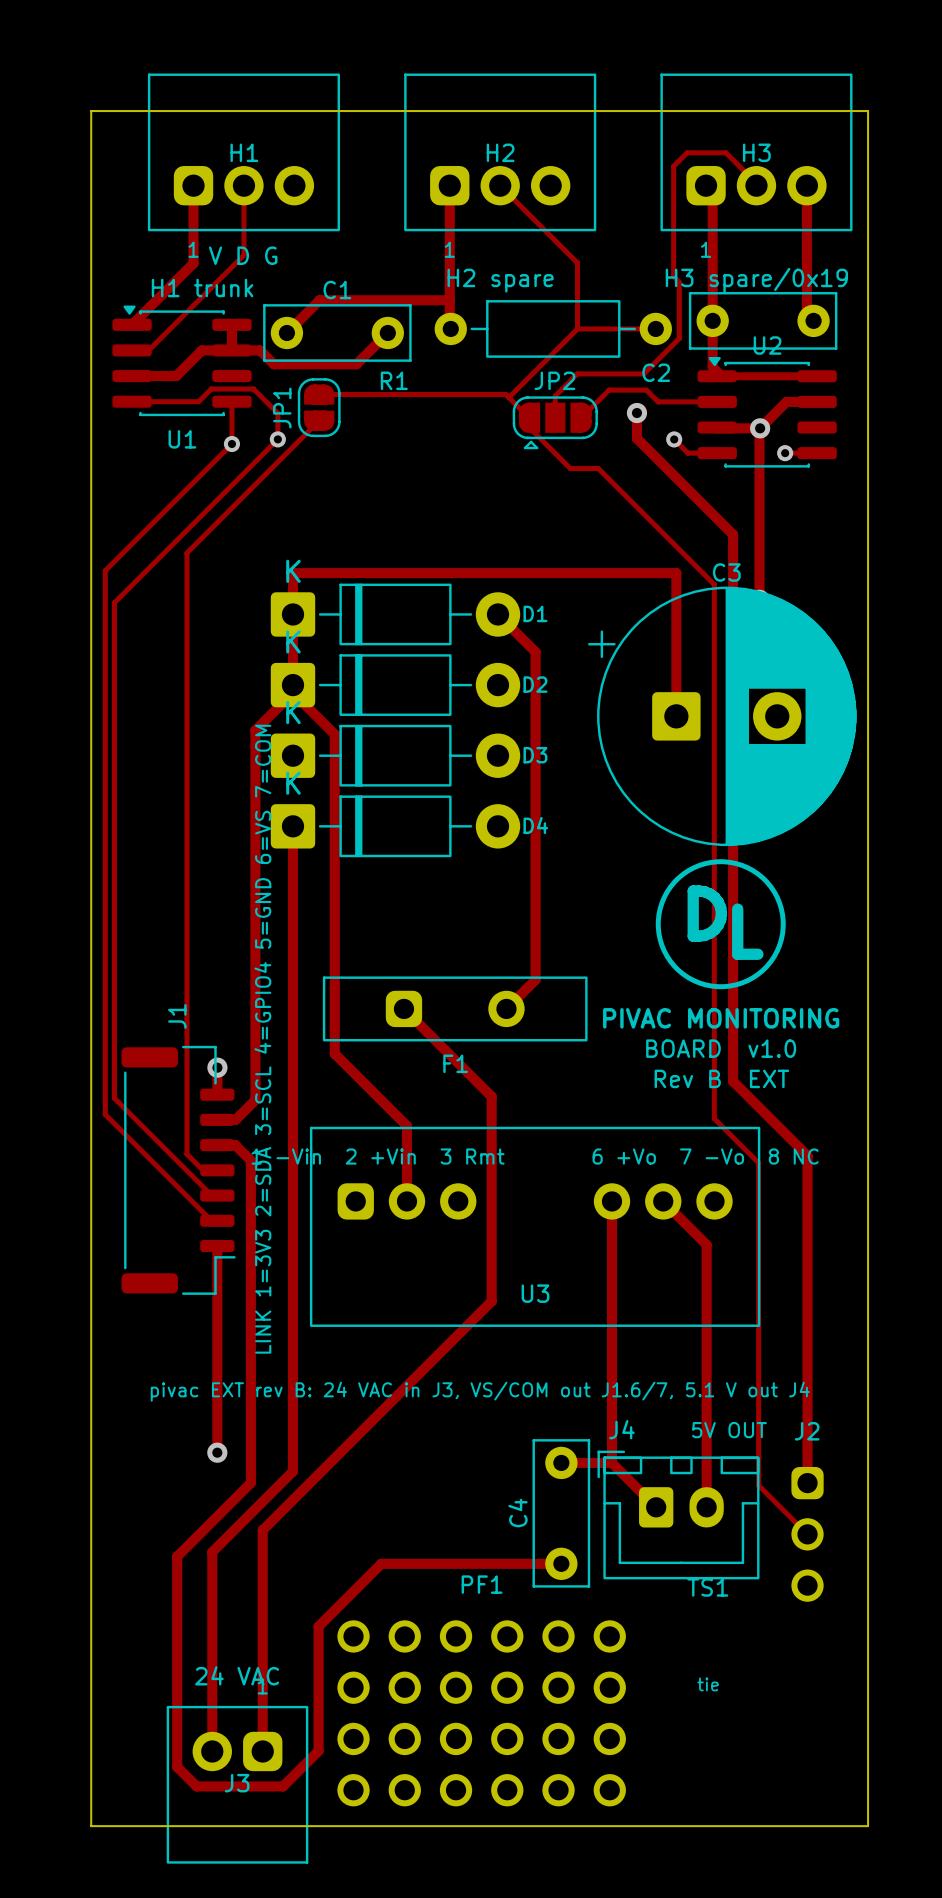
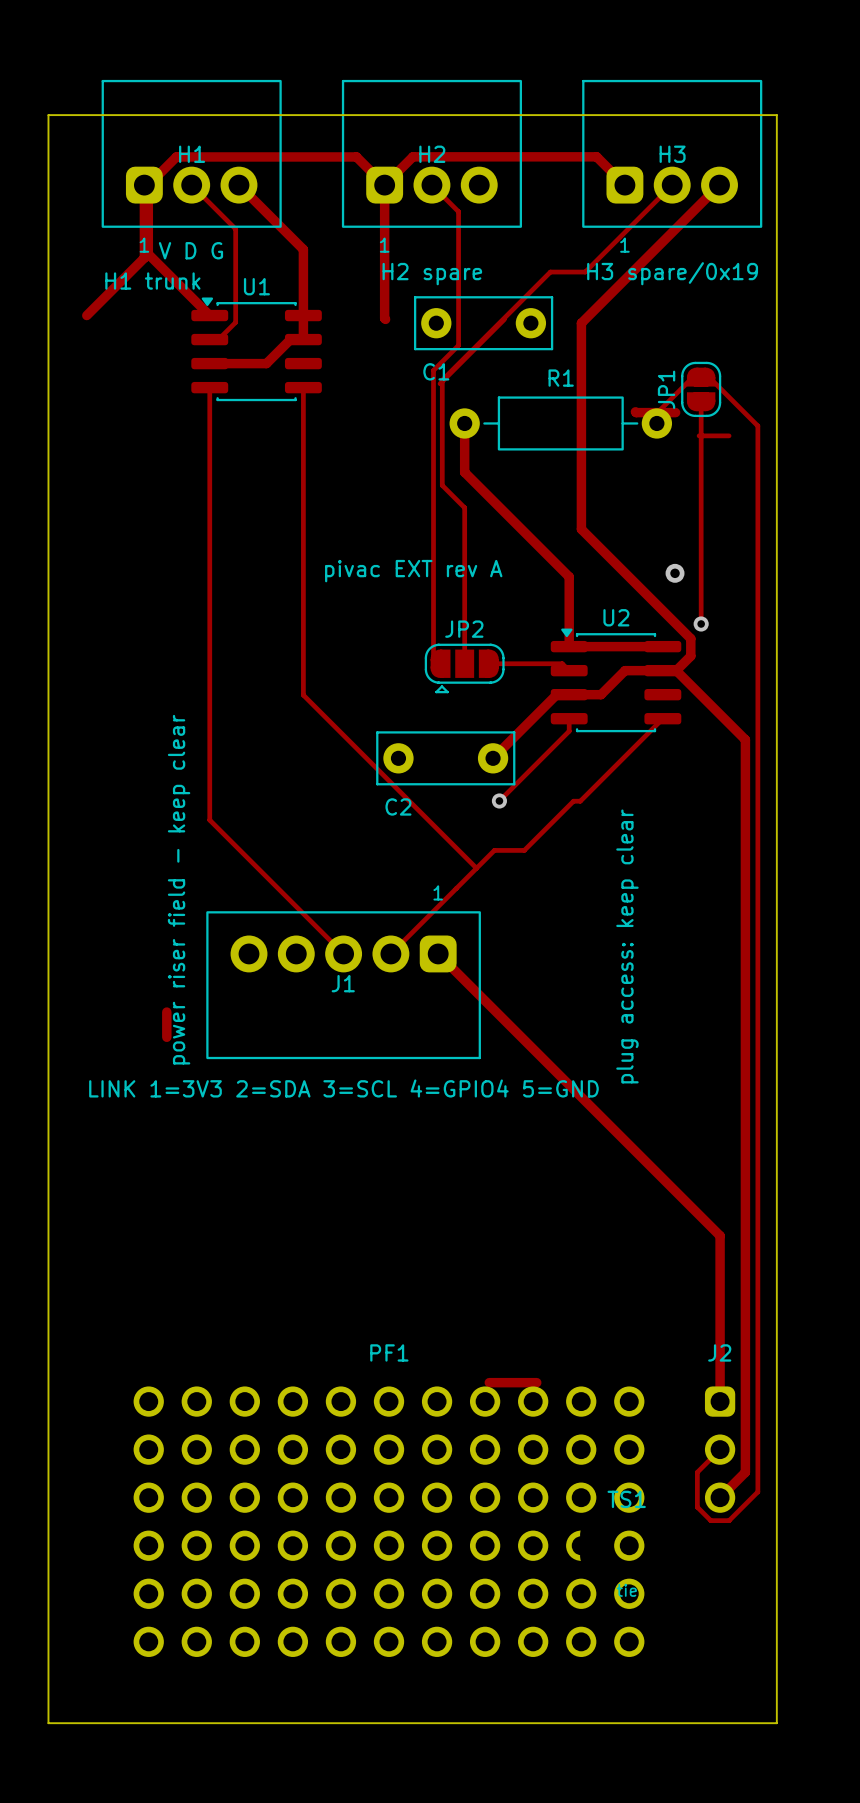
track: (243, 185) (243, 255) (148, 350) (132, 350) -> (191, 185) (235, 229) (235, 322) (218, 339) (209, 339)
track: none -> (238, 185) (303, 249) (303, 339) (290, 339) (266, 363) (209, 363)
track: (706, 185) (712, 192) (712, 367) (721, 376) -> (624, 185) (596, 156) (412, 156) (384, 185) (356, 156) (176, 156) (148, 185) (148, 254) (209, 315)
track: (756, 185) (756, 183) (725, 152) (687, 152) (673, 166) (673, 276) (679, 282) (679, 338) (643, 373) (577, 373) (555, 396) (555, 417) -> (672, 185) (585, 272) (550, 272) (442, 380) (442, 485) (464, 507) (464, 663)
track: (806, 185) (806, 314) (813, 320) -> (719, 185) (581, 323) (581, 529) (690, 638) (690, 656) (676, 670)
track: (528, 214) (577, 262) (577, 328) (655, 328) -> (458, 211) (458, 345) (433, 370) (433, 657) (440, 663)
C1 name position: C1 (337, 290) -> C1 (436, 371)
track: (449, 300) (319, 300) (286, 332) -> none
C2 position: (763, 320) -> (445, 758)
track: (231, 324) (231, 350) -> none
R1 position: (553, 328) -> (560, 423)
C1 position: (337, 332) -> (483, 323)
track: (387, 332) (356, 364) (273, 364) (260, 350) (201, 350) (176, 376) (132, 376) -> none
U1 position: (182, 360) -> (256, 349)
C2 name position: C2 (656, 372) -> C2 (398, 806)
track: (717, 376) (817, 376) -> none
R1 name position: R1 (394, 380) -> R1 (561, 378)
track: (319, 394) (505, 394) (529, 417) (529, 427) (570, 468) (598, 468) (714, 584) (714, 1118) (758, 1162) (758, 1485) (807, 1534) -> (656, 423) (656, 413) (692, 377) (709, 377) (757, 425) (757, 1491) (729, 1520) (710, 1520) (697, 1507) (697, 1472) (720, 1449)
track: (132, 401) (198, 401) (211, 389) (253, 389) (277, 413) (277, 439) (114, 602) (114, 1098) (211, 1195) (217, 1195) -> none
track: (231, 401) (231, 444) (105, 570) (105, 1114) (211, 1220) (217, 1220) -> none
track: none -> (209, 387) (209, 820) (343, 953)
track: none -> (303, 387) (303, 695) (476, 868)
track: (717, 401) (658, 401) (646, 390) (609, 390) (581, 417) -> none
track: (817, 401) (786, 401) (759, 429) (759, 599) -> none
JP1 position: (319, 407) -> (701, 389)
U2 position: (767, 412) -> (616, 680)
track: (636, 413) (636, 438) (733, 534) (733, 1081) (807, 1155) (807, 1306) -> (438, 953) (720, 1235)
via: (636, 413) -> none
track: none -> (701, 401) (701, 623)
track: (319, 420) (186, 553) (186, 1154) (203, 1170) (217, 1170) -> none
JP2 position: (555, 422) -> (464, 668)
via: (760, 428) -> none
U1 name position: U1 (182, 439) -> U1 (256, 286)
via: (277, 439) -> none
track: none -> (464, 423) (464, 472) (569, 576) (569, 646) (662, 646)
track: (674, 439) (687, 453) (717, 453) -> none
via: (674, 439) -> none
via: (231, 444) -> none
via: (785, 453) -> none
text: none -> pivac EXT rev A (413, 571)
D1: (395, 614) -> none
track: (498, 614) (535, 652) (535, 979) (506, 1008) -> none
via: none -> (701, 623)
D2: (395, 685) -> none
track: (292, 692) (292, 573) (676, 573) (676, 716) -> none
track: (292, 692) (334, 734) (334, 1053) (407, 1126) (407, 1201) -> none
track: (293, 692) (255, 730) (255, 1100) (235, 1119) (217, 1119) -> none
track: none -> (489, 663) (562, 663) (569, 670)
track: none -> (676, 670) (745, 739) (745, 1472) (720, 1497)
track: none -> (676, 670) (625, 670) (601, 694) (556, 694) (493, 758)
C3: (722, 716) -> none
track: none -> (569, 718) (569, 731) (499, 800)
track: none -> (662, 718) (580, 801) (573, 801) (524, 850) (494, 850) (390, 953)
D3: (395, 755) -> none
track: (292, 826) (292, 1471) (212, 1552) (212, 1751) -> none
D4: (395, 826) -> none
via: none -> (499, 800)
drawing: [655, 859, 786, 990] -> none
line: (693, 891) (693, 936) (704, 935) (710, 933) (718, 924) (721, 913) (720, 907) (718, 902) (710, 894) (693, 891) -> none
line: (737, 909) (737, 954) (757, 954) -> none
text: none -> power riser field - keep clear (179, 889)
text: none -> plug access: keep clear (627, 946)
track: (403, 1008) (491, 1096) (491, 1301) (262, 1530) (262, 1751) -> none
F1: (455, 1008) -> none
J1 name position: J1 (177, 1016) -> J1 (343, 983)
text: PIVAC MONITORING (721, 1018) -> none
text: LINK 1=3V3 2=SDA 3=SCL 4=GPIO4 5=GND 6=VS 7=COM (262, 1039) -> LINK 1=3V3 2=SDA 3=SCL 4=GPIO4 5=GND (343, 1088)
J1 footprint: [121, 1045, 236, 1295] -> [206, 911, 481, 1060]
text: BOARD v1.0 (721, 1048) -> none
via: (217, 1067) -> none
text: Rev B EXT (721, 1078) -> none
track: (217, 1145) (235, 1145) (250, 1160) (250, 1482) (177, 1556) (177, 1766) (196, 1786) (283, 1786) (318, 1751) (318, 1626) (381, 1563) (561, 1563) -> none
track: (612, 1201) (612, 1463) (656, 1507) -> none
track: (663, 1201) (706, 1244) (706, 1507) -> none
U3: (535, 1226) -> none
track: (217, 1246) (217, 1452) -> none
text: pivac EXT rev B: 24 VAC in J3, VS/COM out J1.6/7, 5.1 V out J4 (480, 1391) -> none
text: 5V OUT (729, 1430) -> none
via: (217, 1452) -> none
C4: (561, 1513) -> none
J4: (678, 1514) -> none
PF1 name position: PF1 (482, 1584) -> PF1 (389, 1352)
PF1 footprint: [337, 1620, 626, 1807] -> [133, 1386, 645, 1657]
text: 24 VAC (237, 1675) -> none
J3: (237, 1784) -> none

